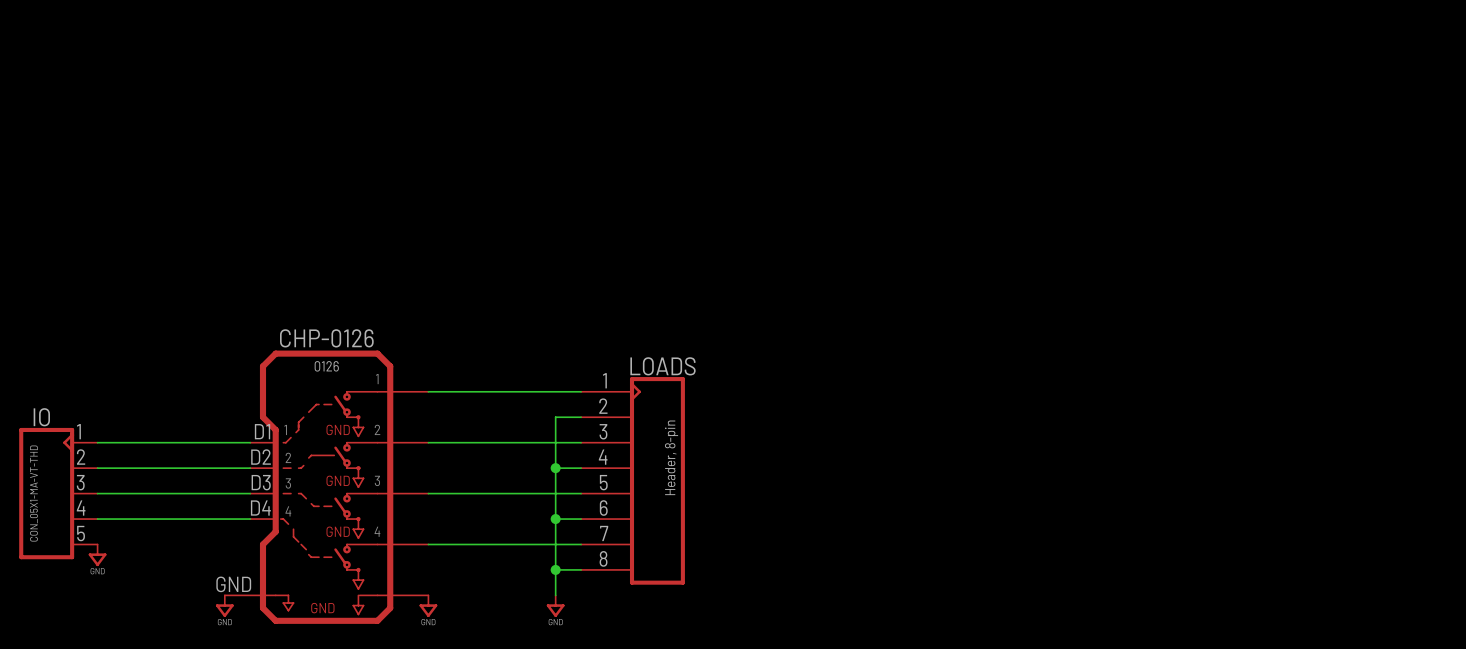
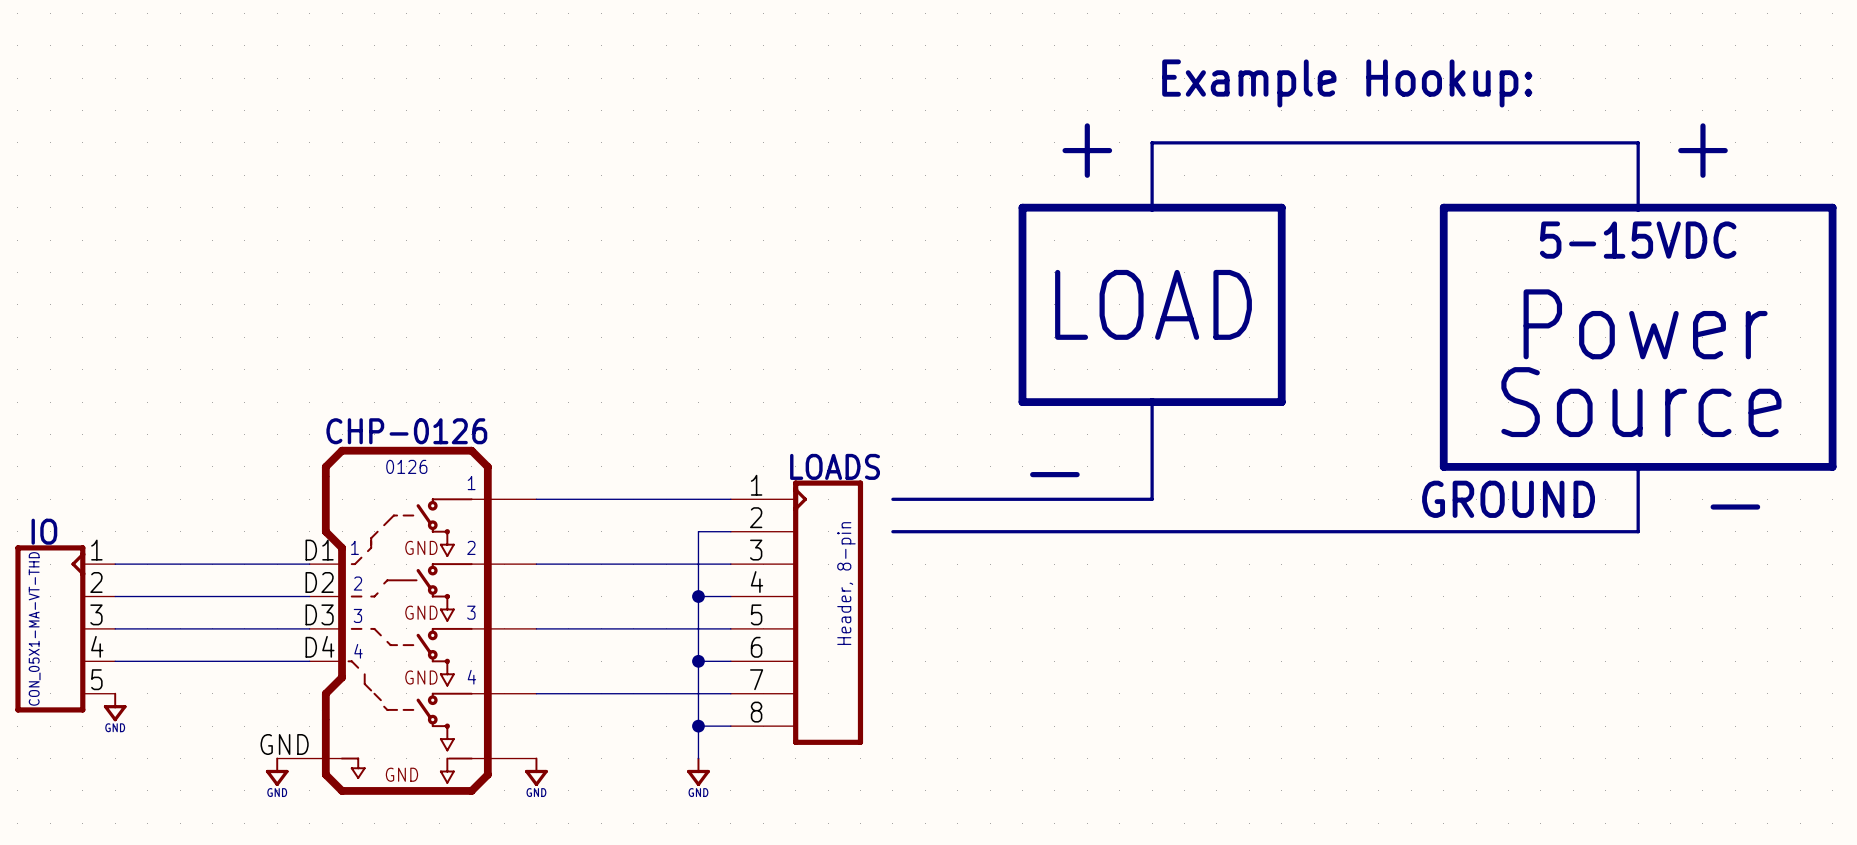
text: none -> Example Hookup: (1347, 83)
text: none -> + (1087, 150)
text: none -> + (1702, 150)
line: none -> (1022, 207) (1281, 207) (1281, 402) (1022, 402) (1022, 207)
line: none -> (1152, 207) (1152, 142) (1638, 142) (1638, 207)
line: none -> (1443, 207) (1832, 207) (1832, 466) (1443, 466) (1443, 207)
text: none -> 5-15VDC (1638, 240)
text: none -> LOAD (1153, 304)
text: none -> Power (1645, 324)
line: none -> (1152, 402) (1152, 499) (892, 499)
text: none -> Source (1641, 402)
line: none -> (1638, 466) (1638, 531) (892, 531)
text: none -> - (1054, 474)
text: none -> GROUND (1508, 499)
text: none -> - (1735, 507)

